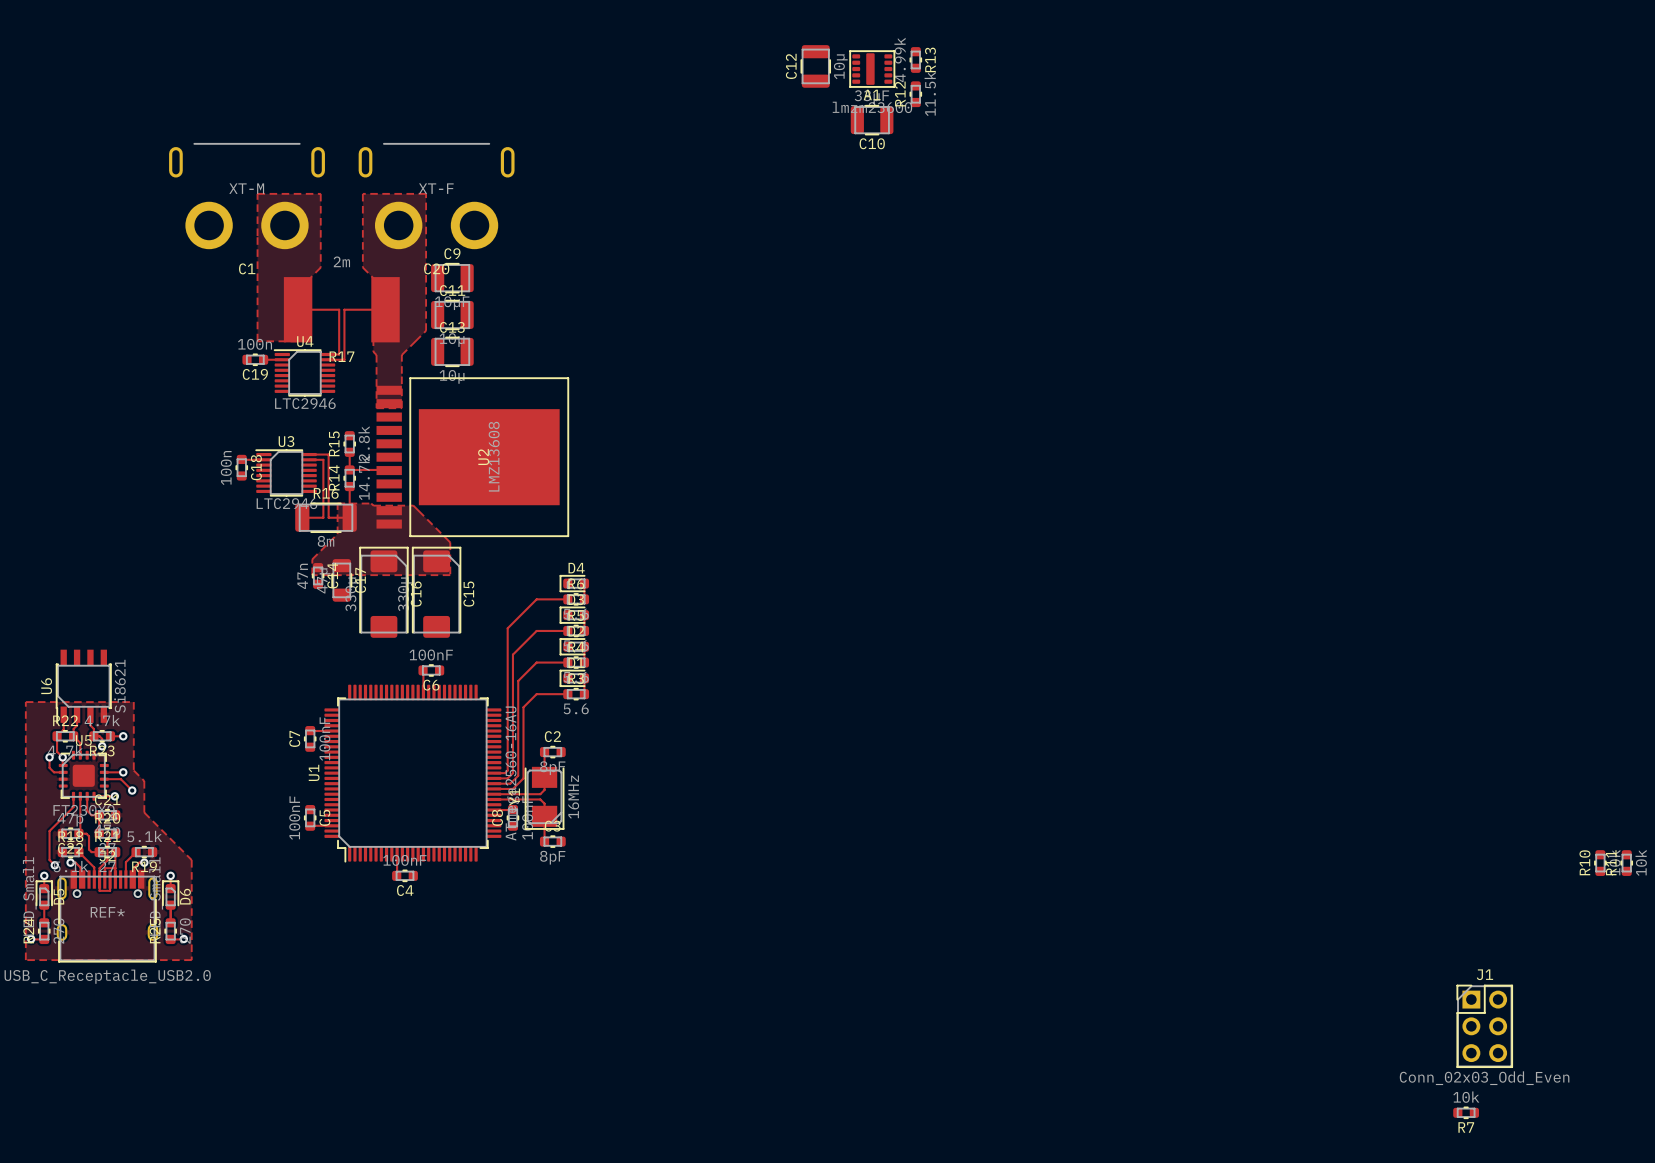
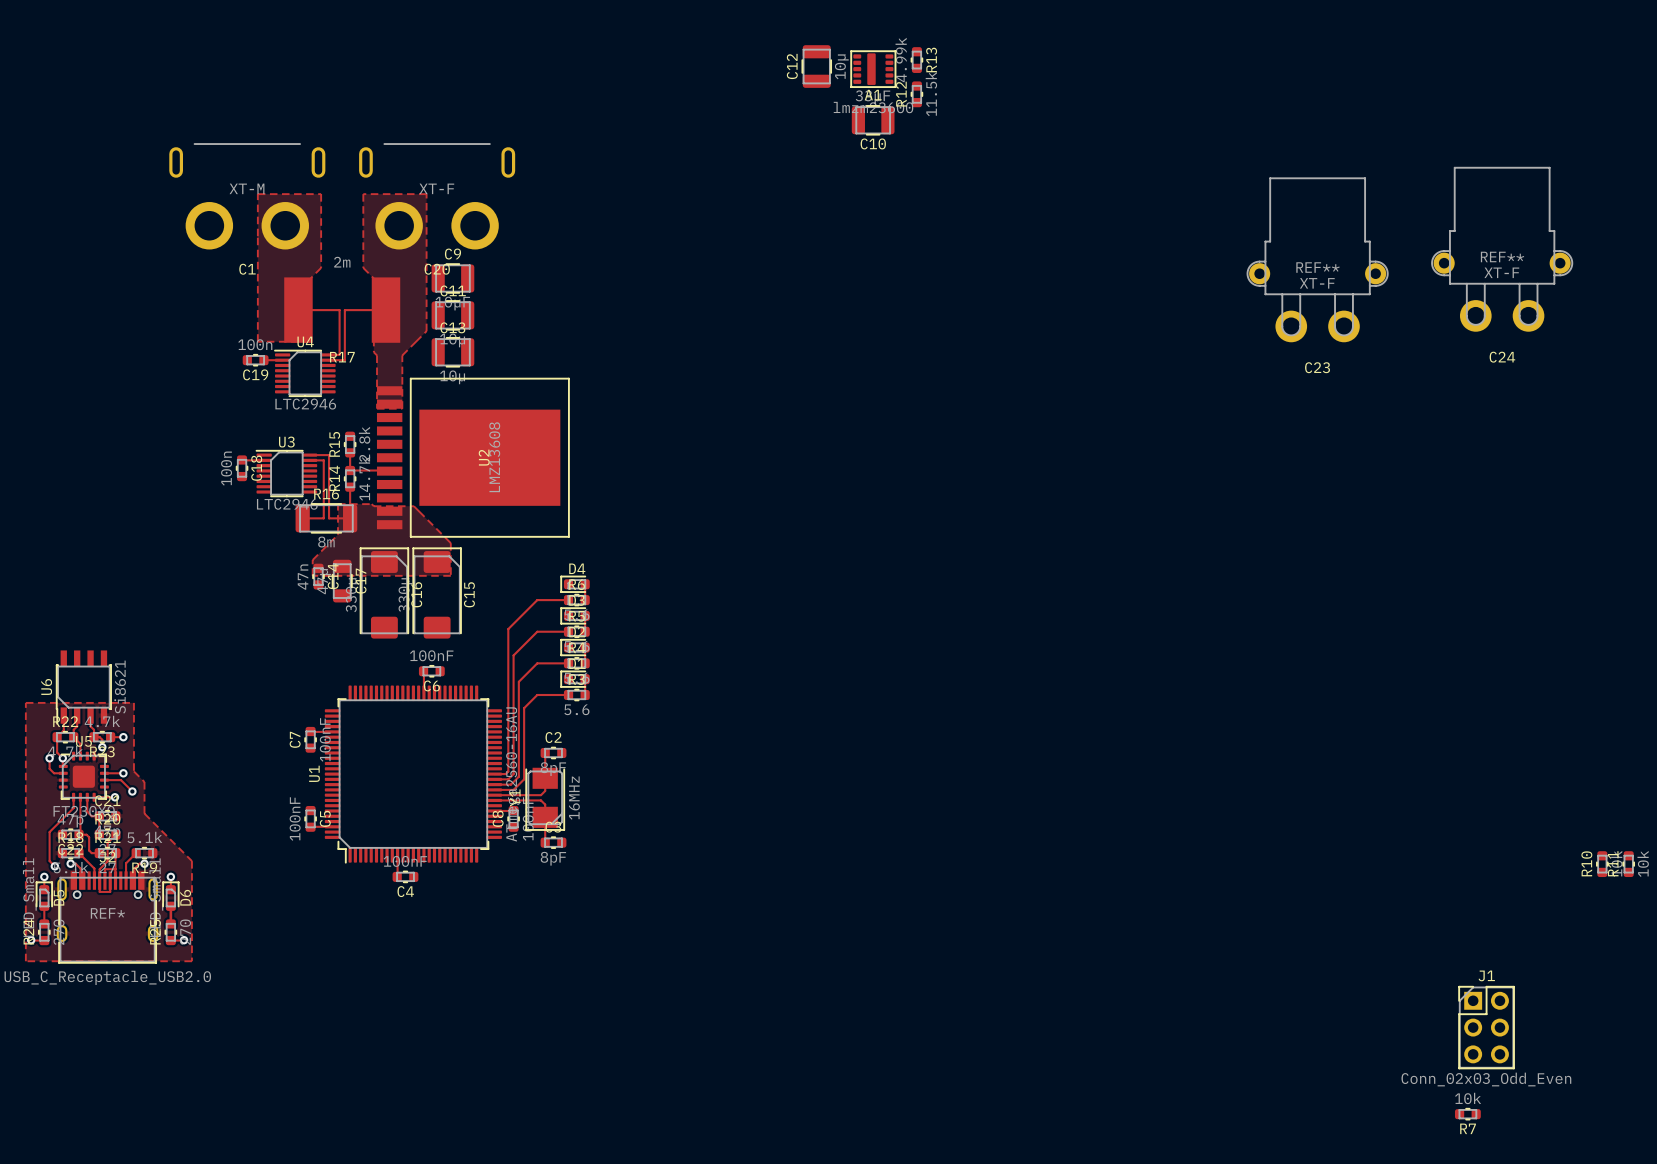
C24: none -> XT-F (1502, 249)
C23: none -> XT-F (1317, 260)

